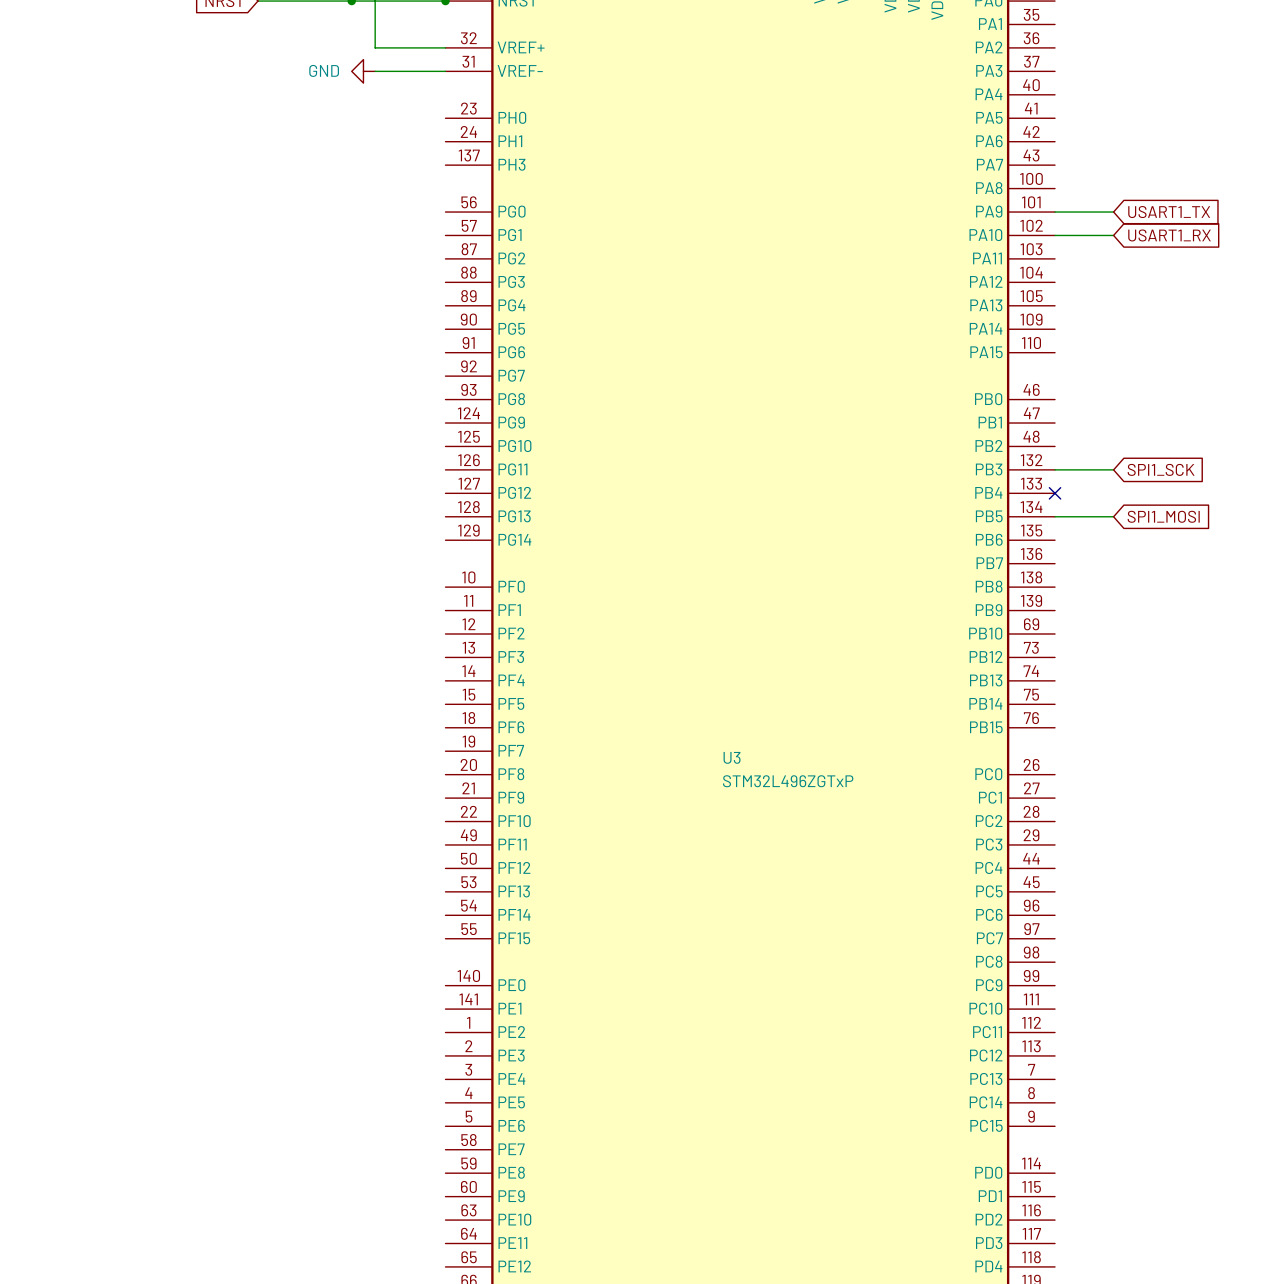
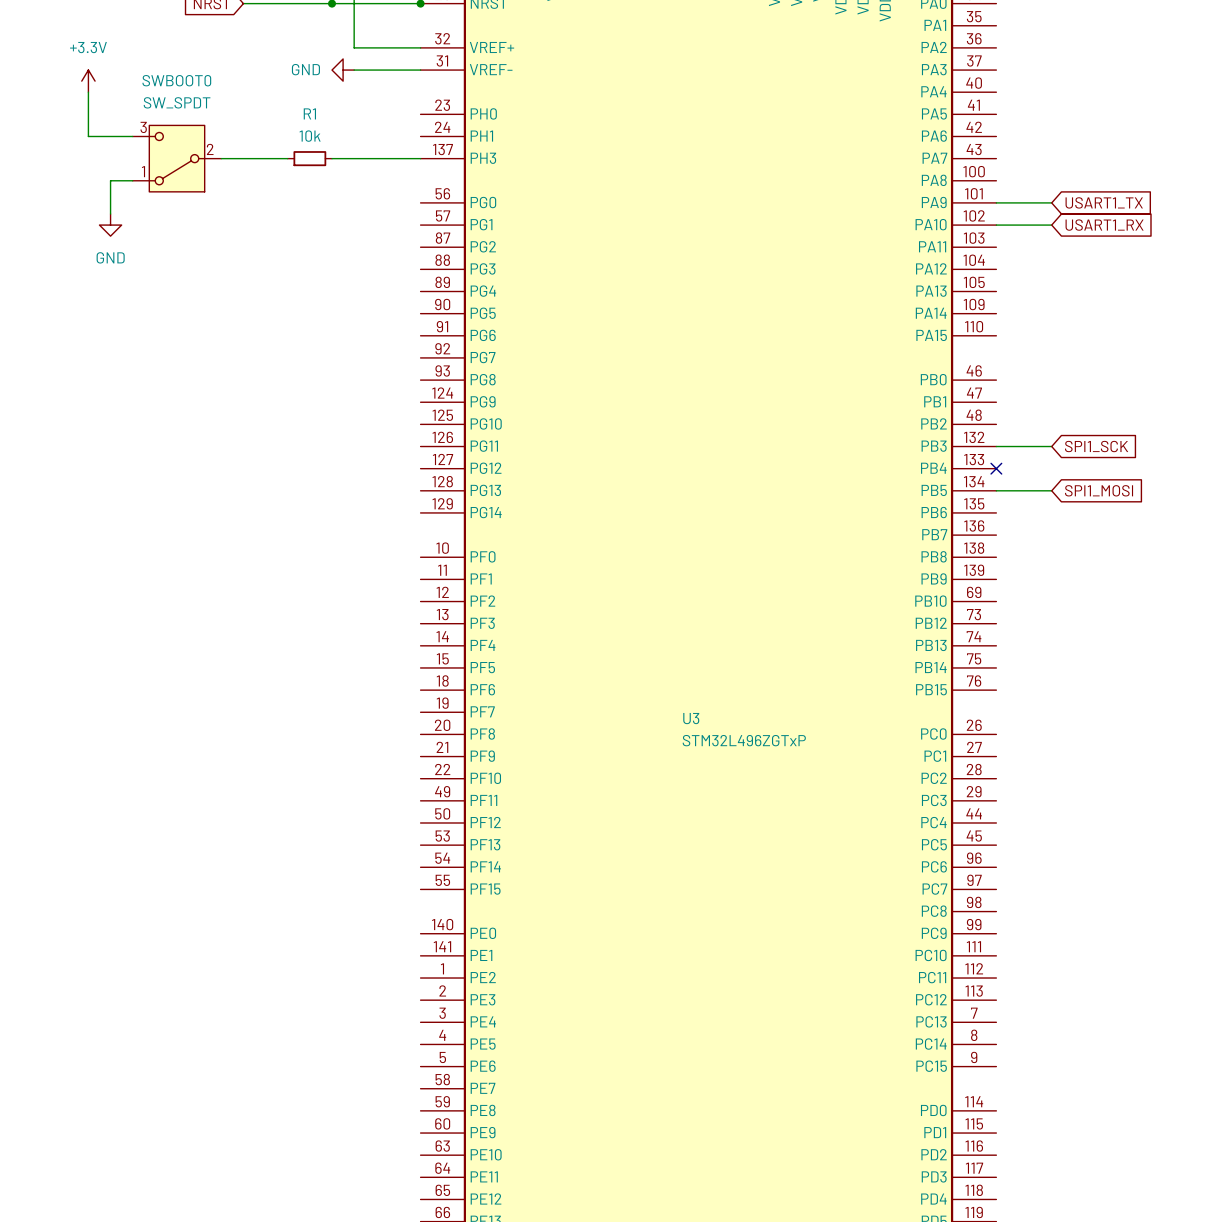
power symbol: none -> +3.3V (88, 81)
wire: none -> (88, 92) (88, 136) (132, 136)
SWBOOT0: none -> SW_SPDT (176, 158)
wire: none -> (221, 158) (287, 158)
R1: none -> 10k (309, 158)
wire: none -> (332, 158) (420, 158)
wire: none -> (132, 180) (110, 180) (110, 213)
power symbol: none -> GND (110, 225)

